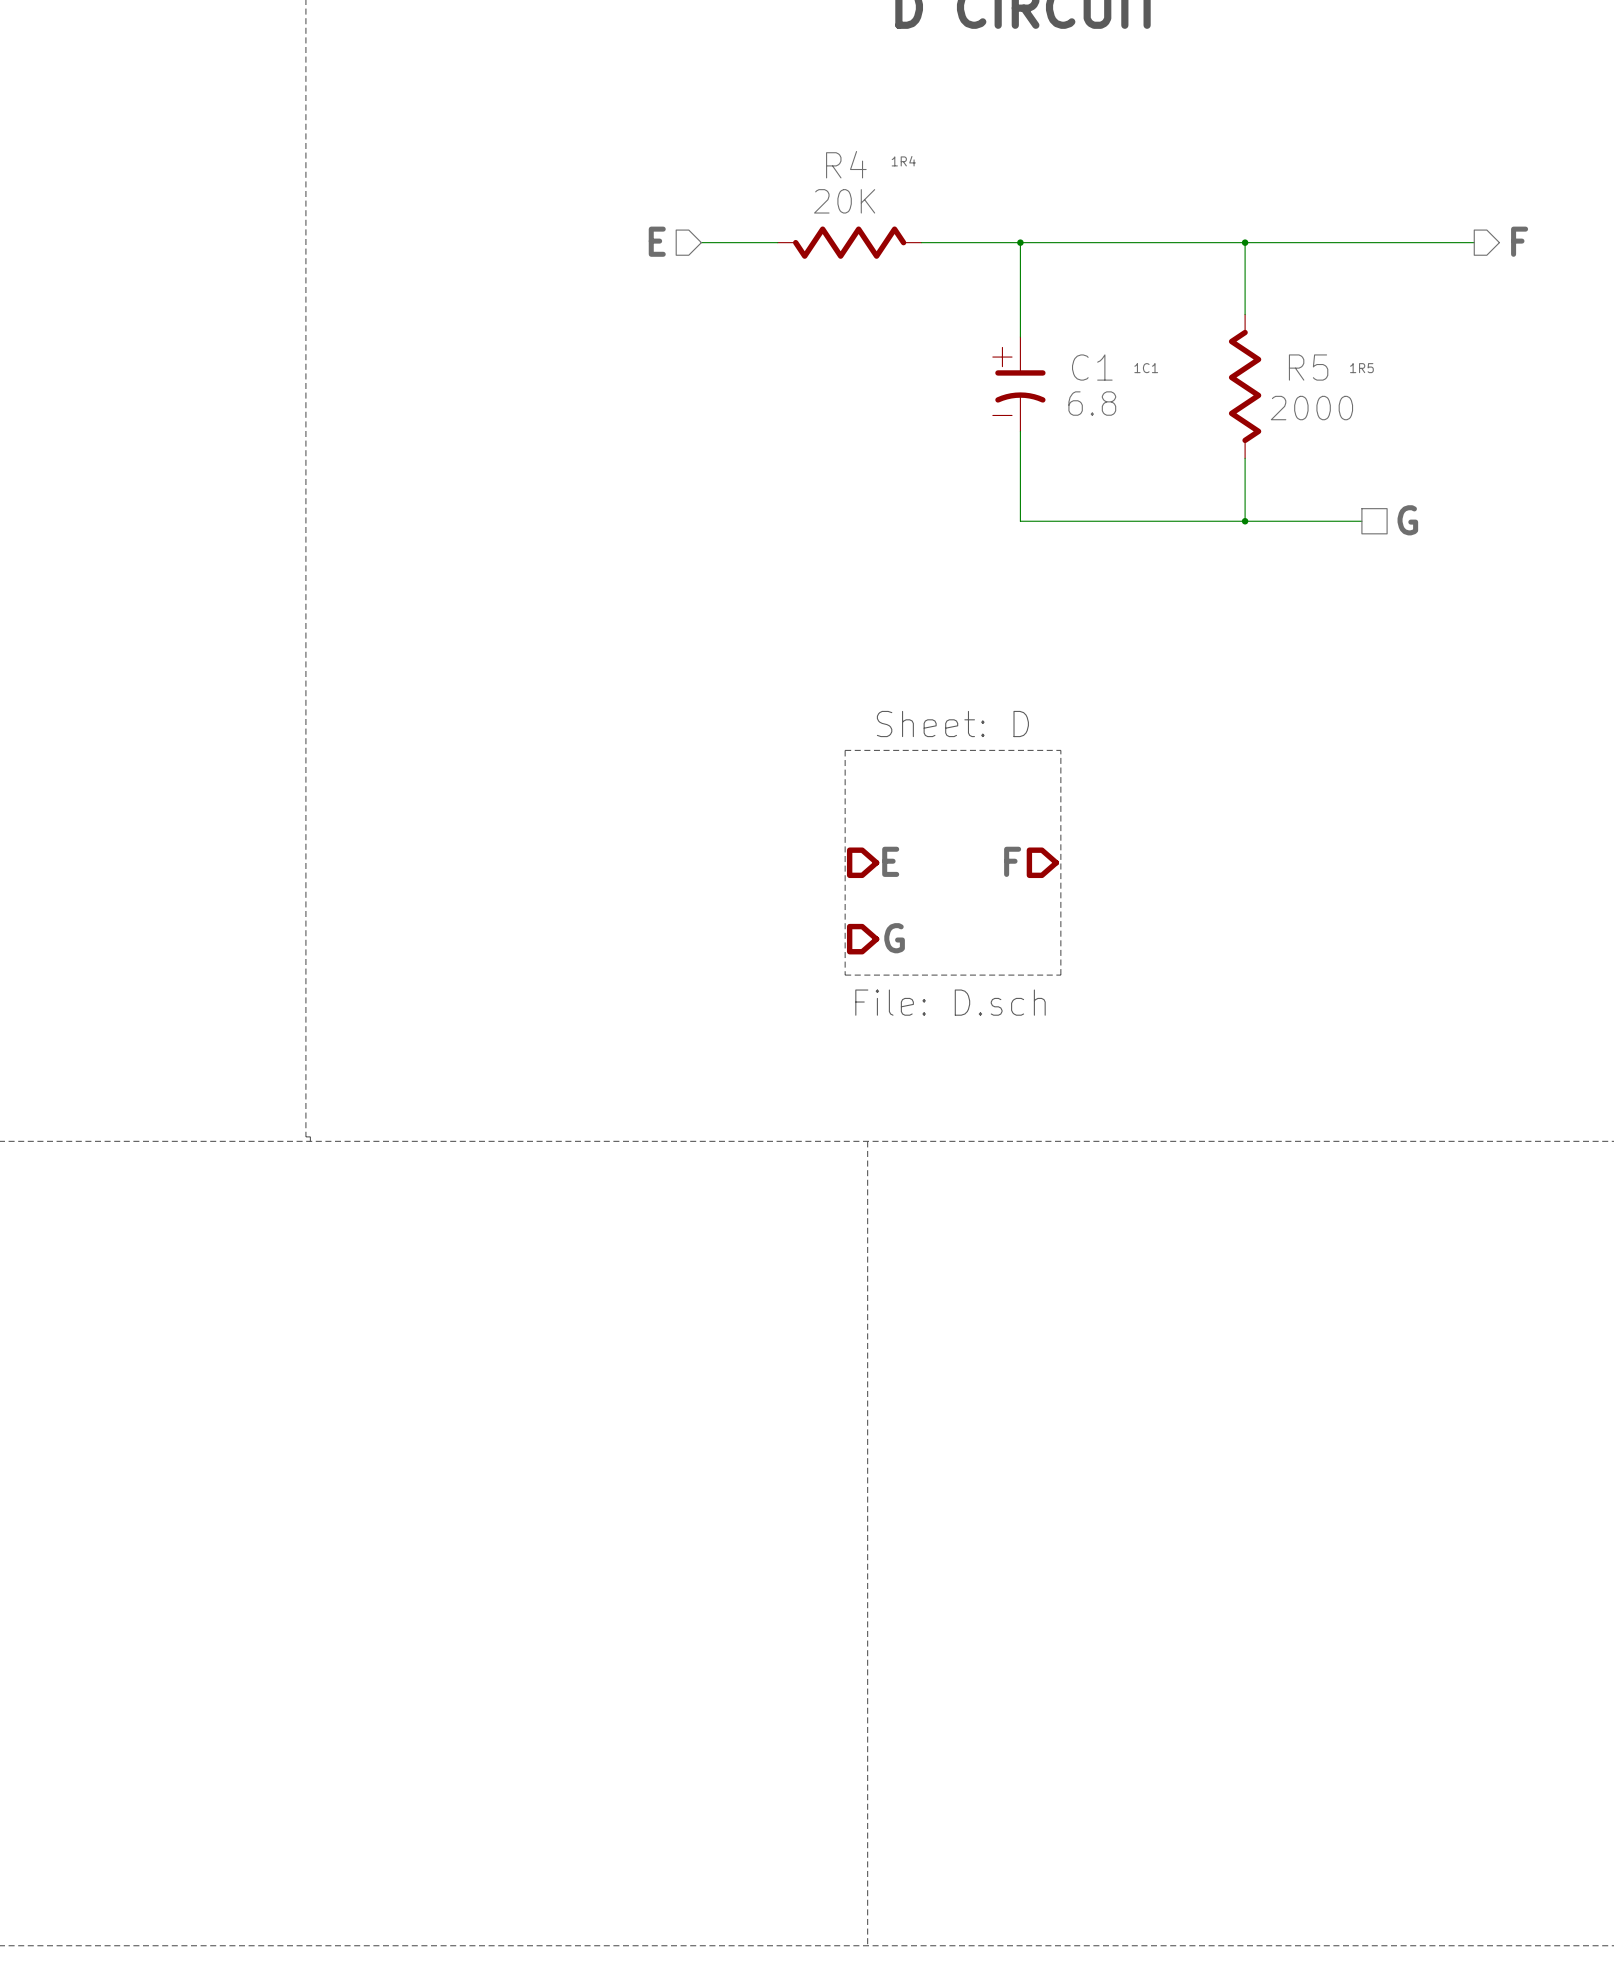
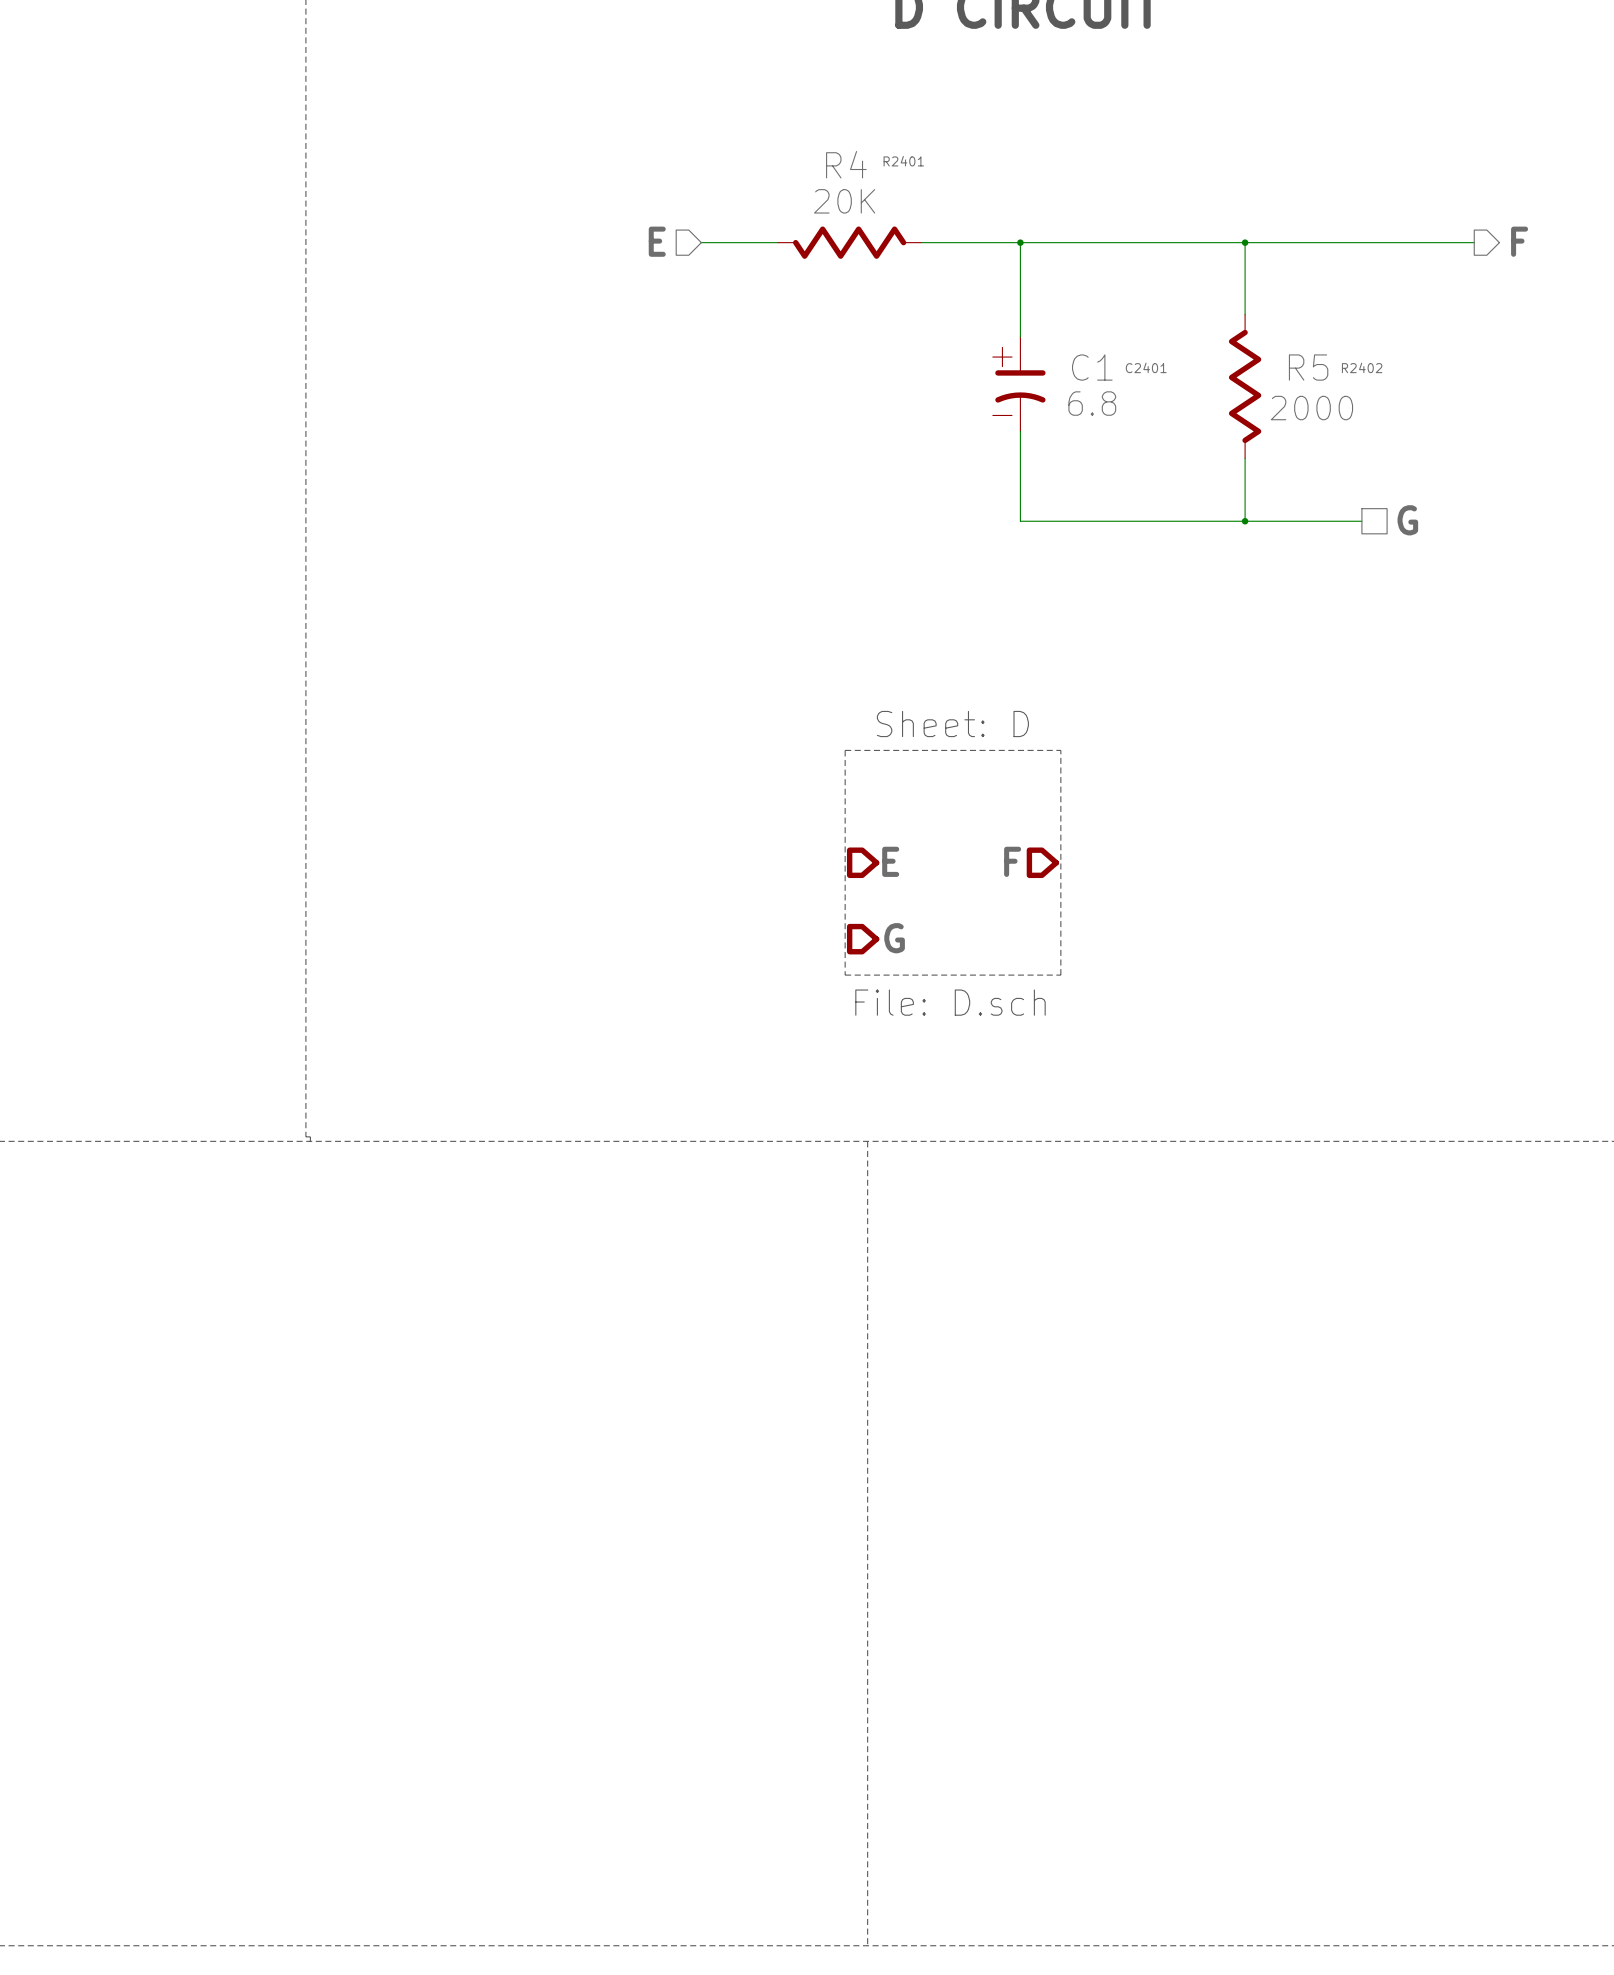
1R4 name: 1R4 (903, 161) -> R2401 (903, 161)
1C1 name: 1C1 (1146, 368) -> C2401 (1146, 367)
1R5 name: 1R5 (1361, 368) -> R2402 (1362, 367)

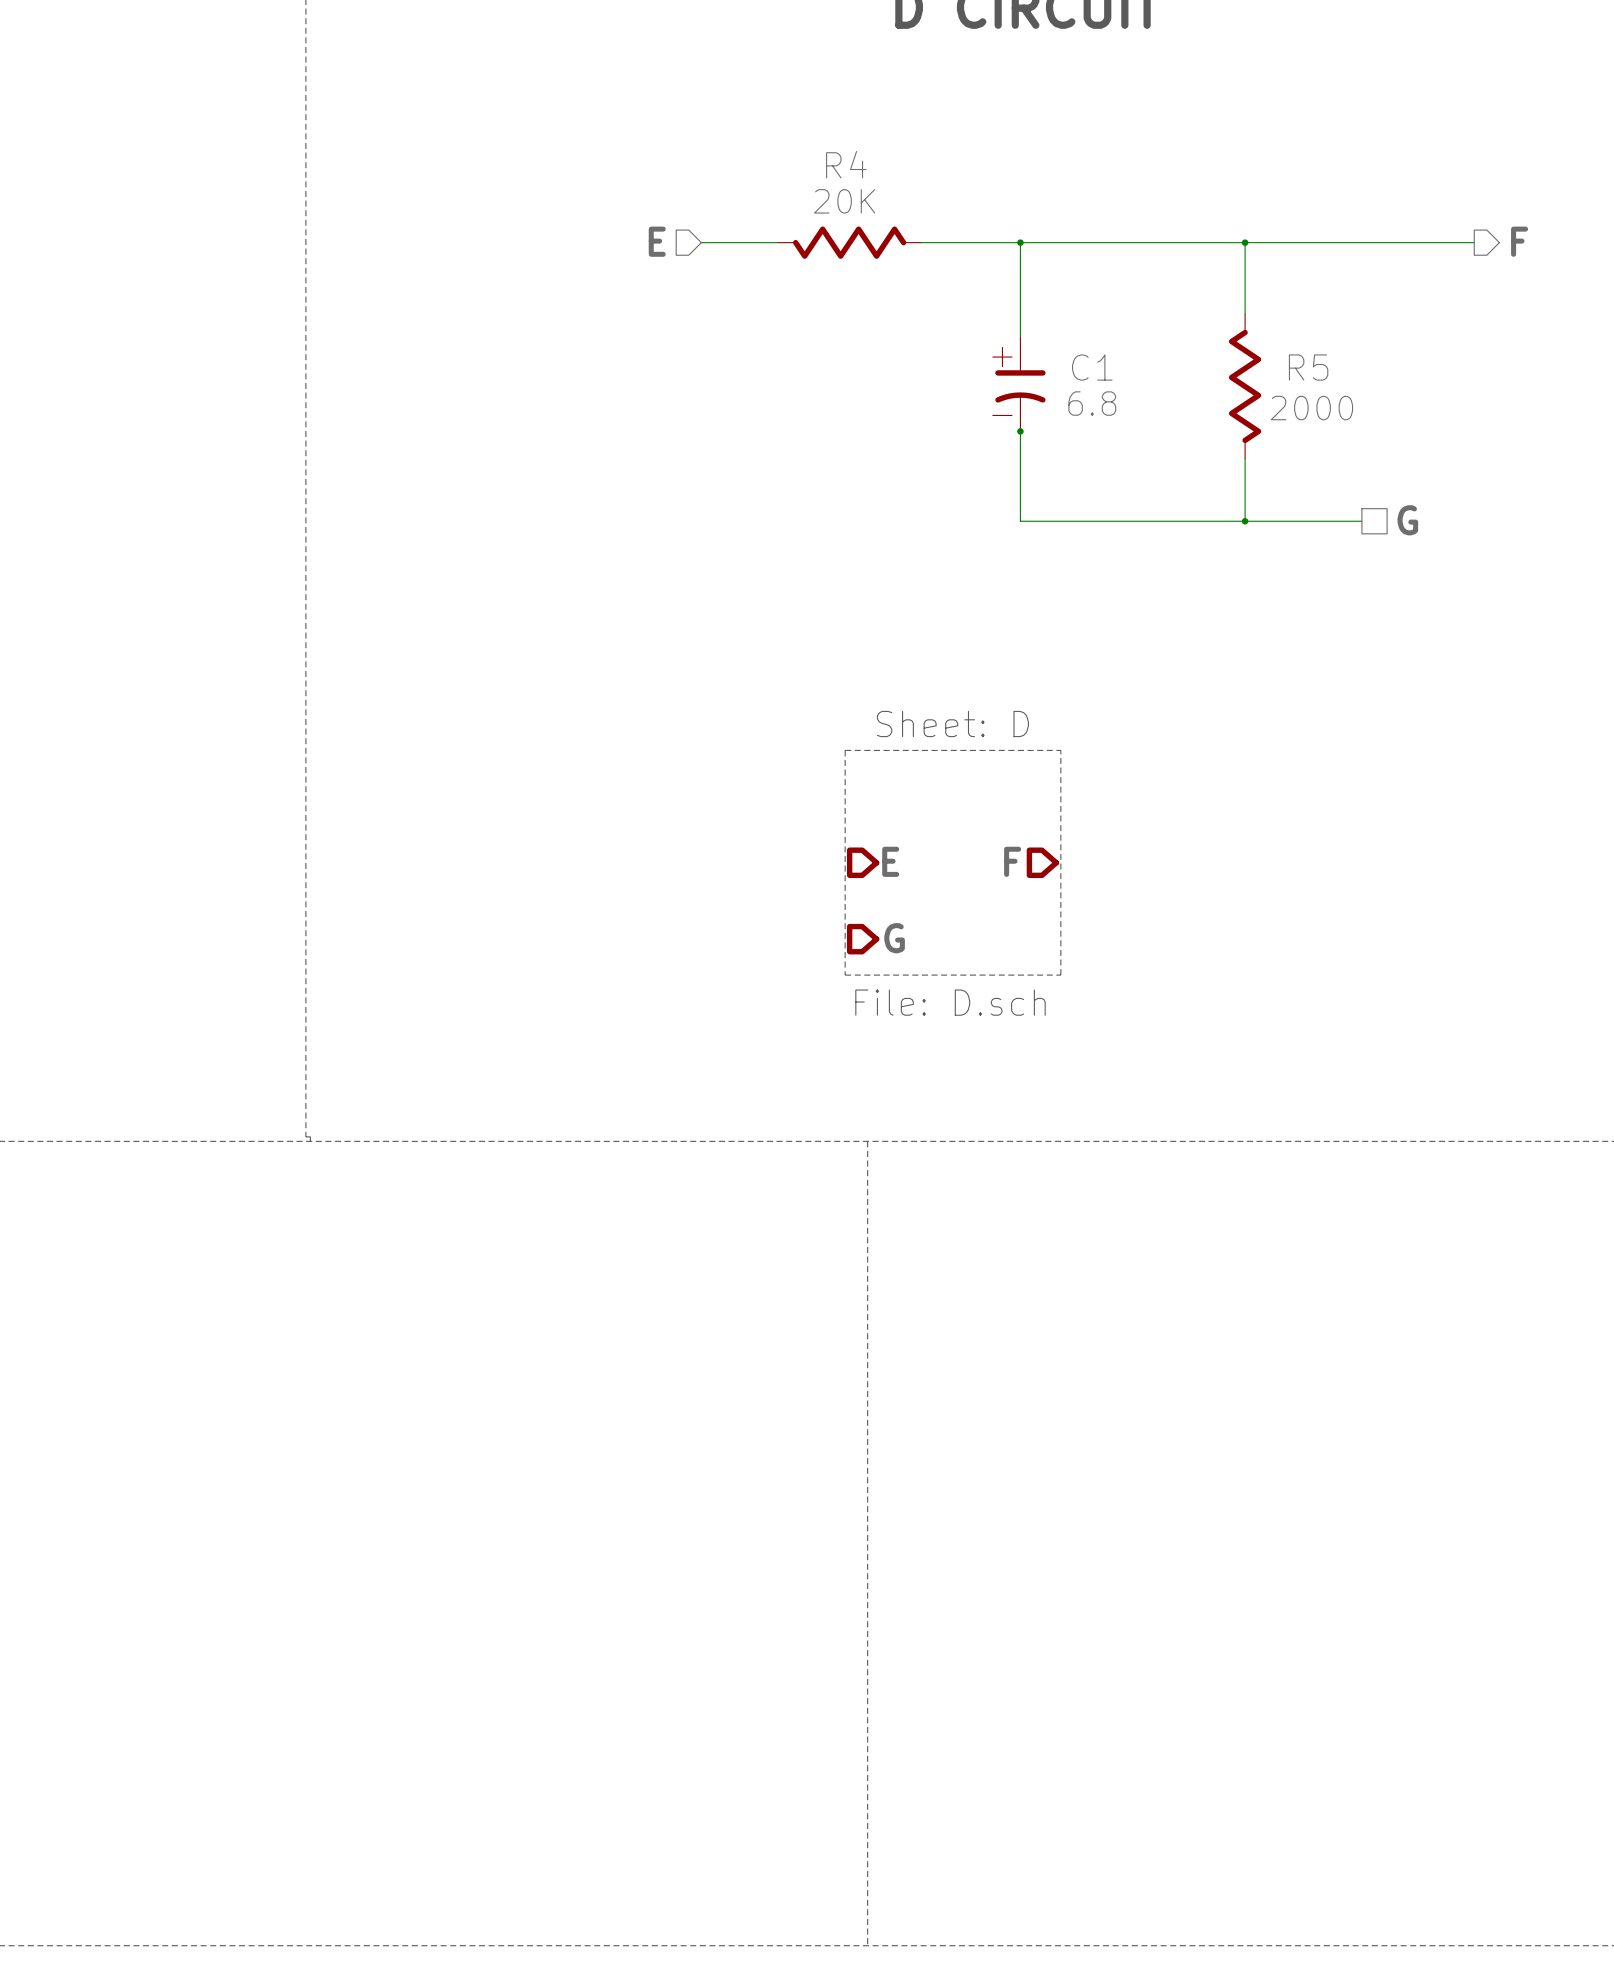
R2401 name: R2401 (903, 161) -> none
C2401 name: C2401 (1146, 367) -> none
R2402 name: R2402 (1362, 367) -> none
junction: none -> (1020, 431)

